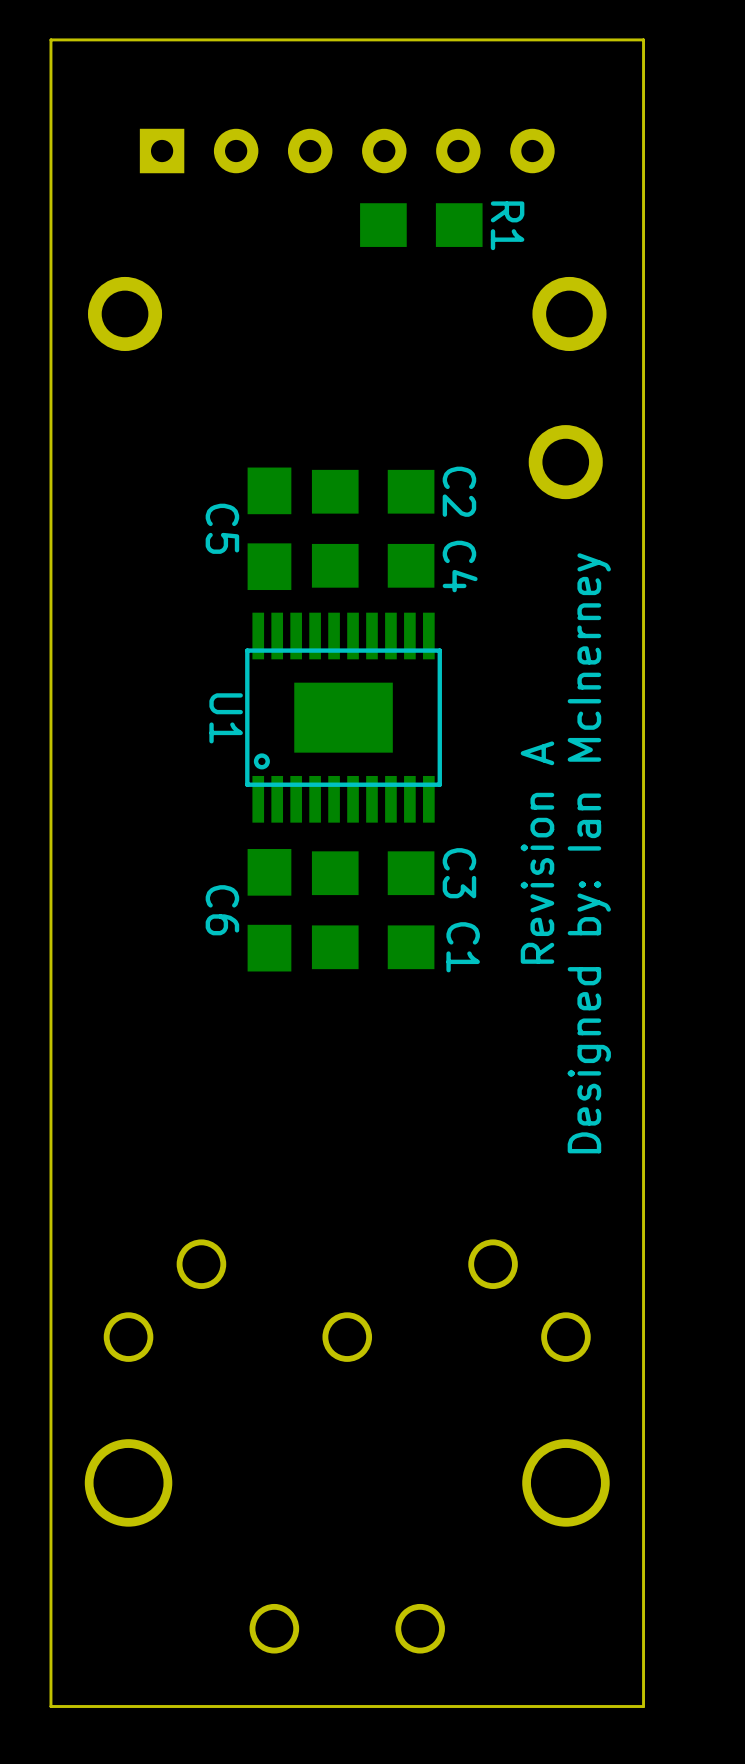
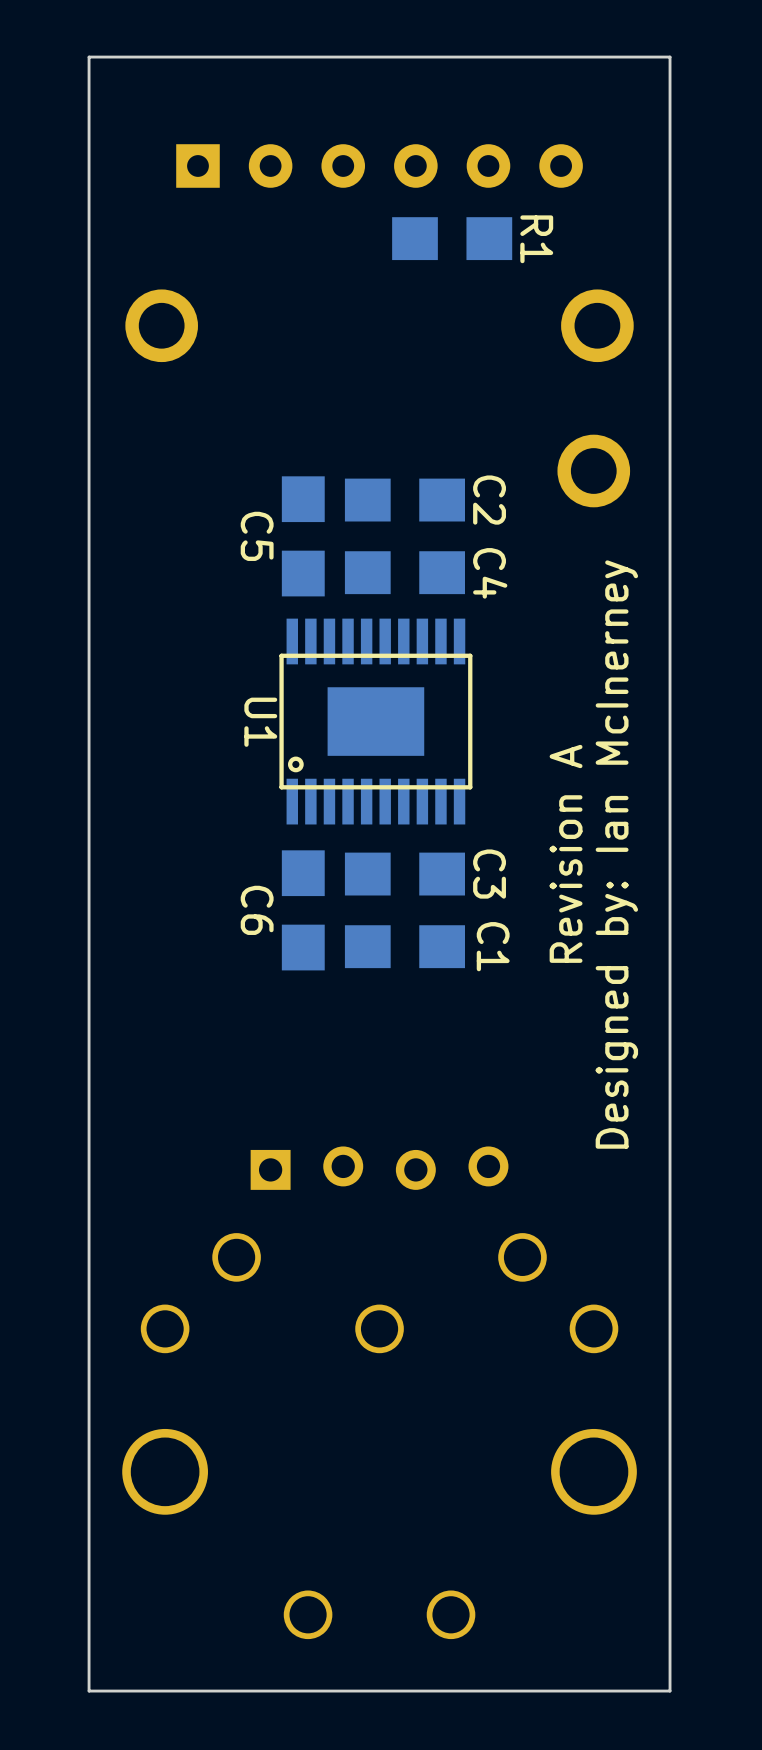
part: none -> (379, 1168)

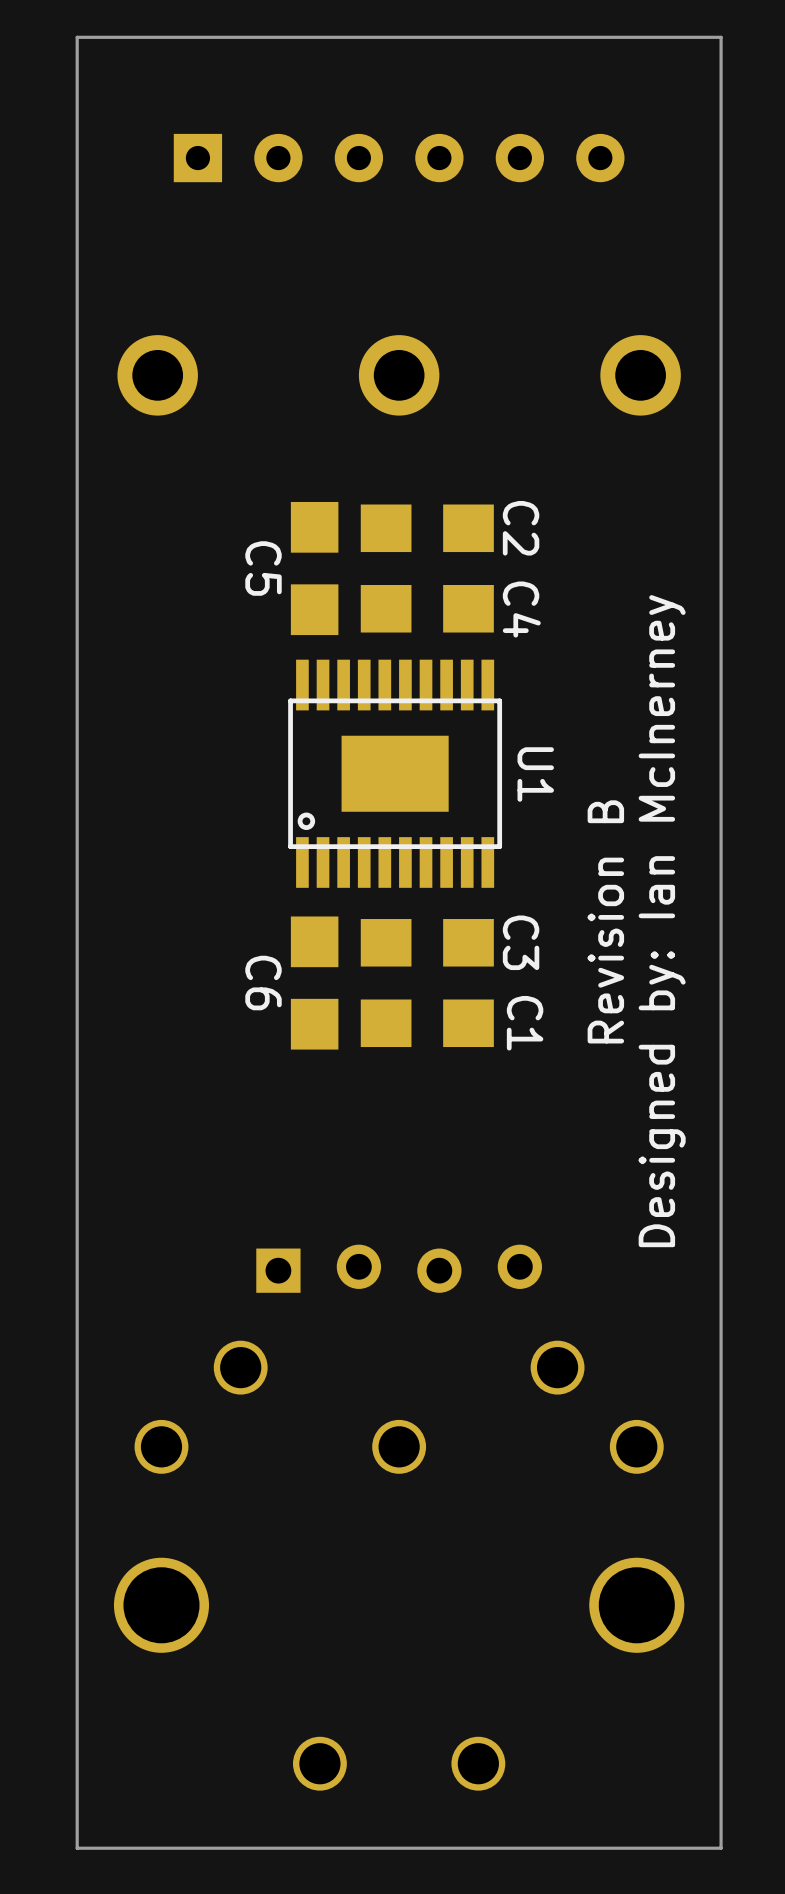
R1: (452, 238) -> none
part position: (161, 325) -> (157, 375)
part position: (597, 325) -> (640, 375)
part: none -> (399, 375)
part: (593, 471) -> none
U1 name position: U1 (260, 722) -> U1 (535, 774)
text: Revision A (566, 853) -> Revision B (605, 921)

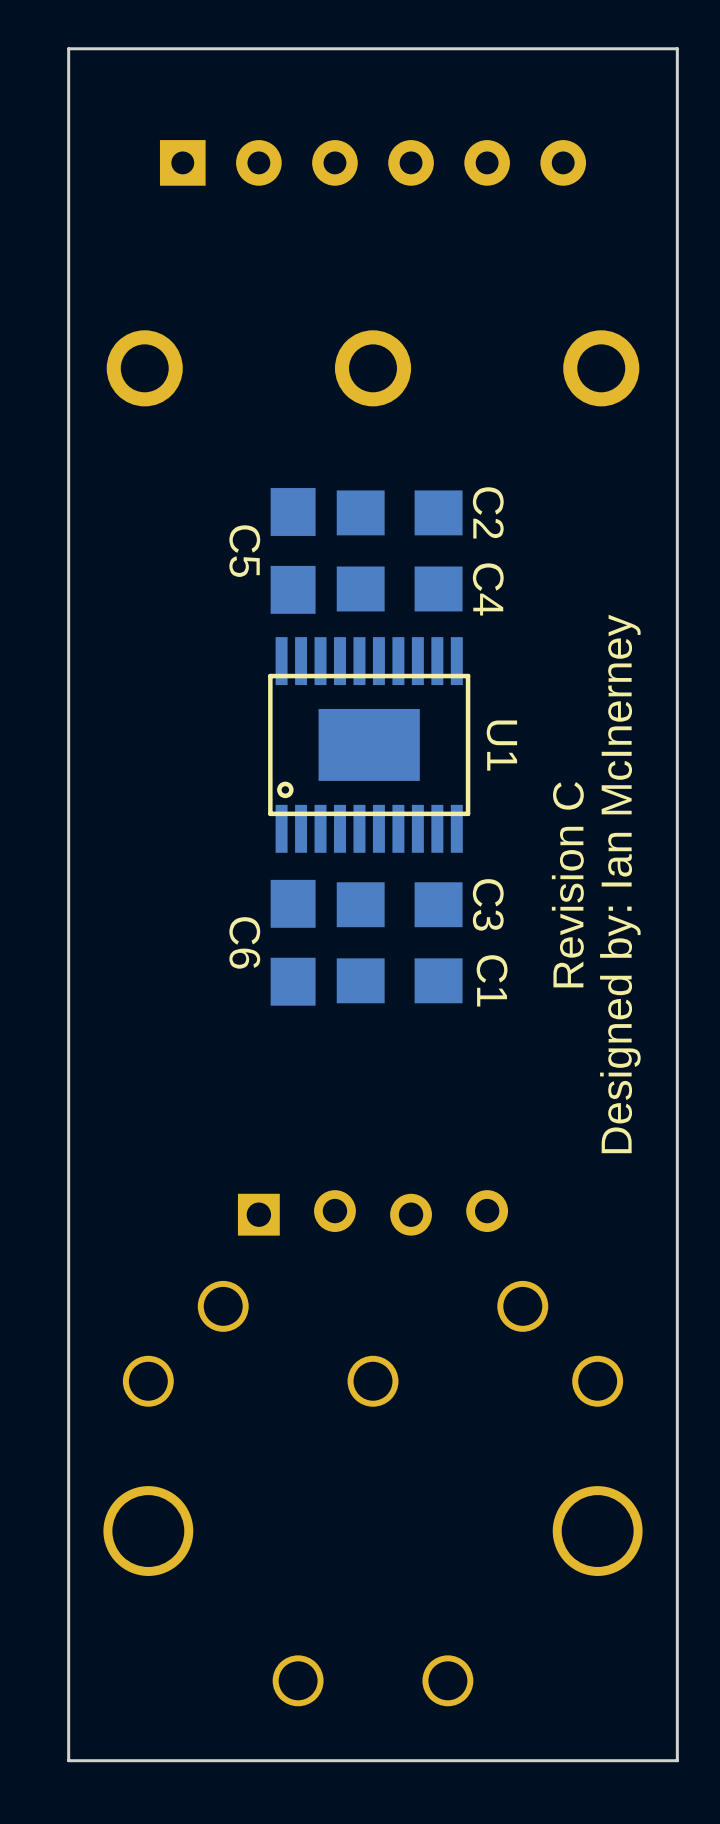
text: Revision B (605, 921) -> Revision C (567, 884)

